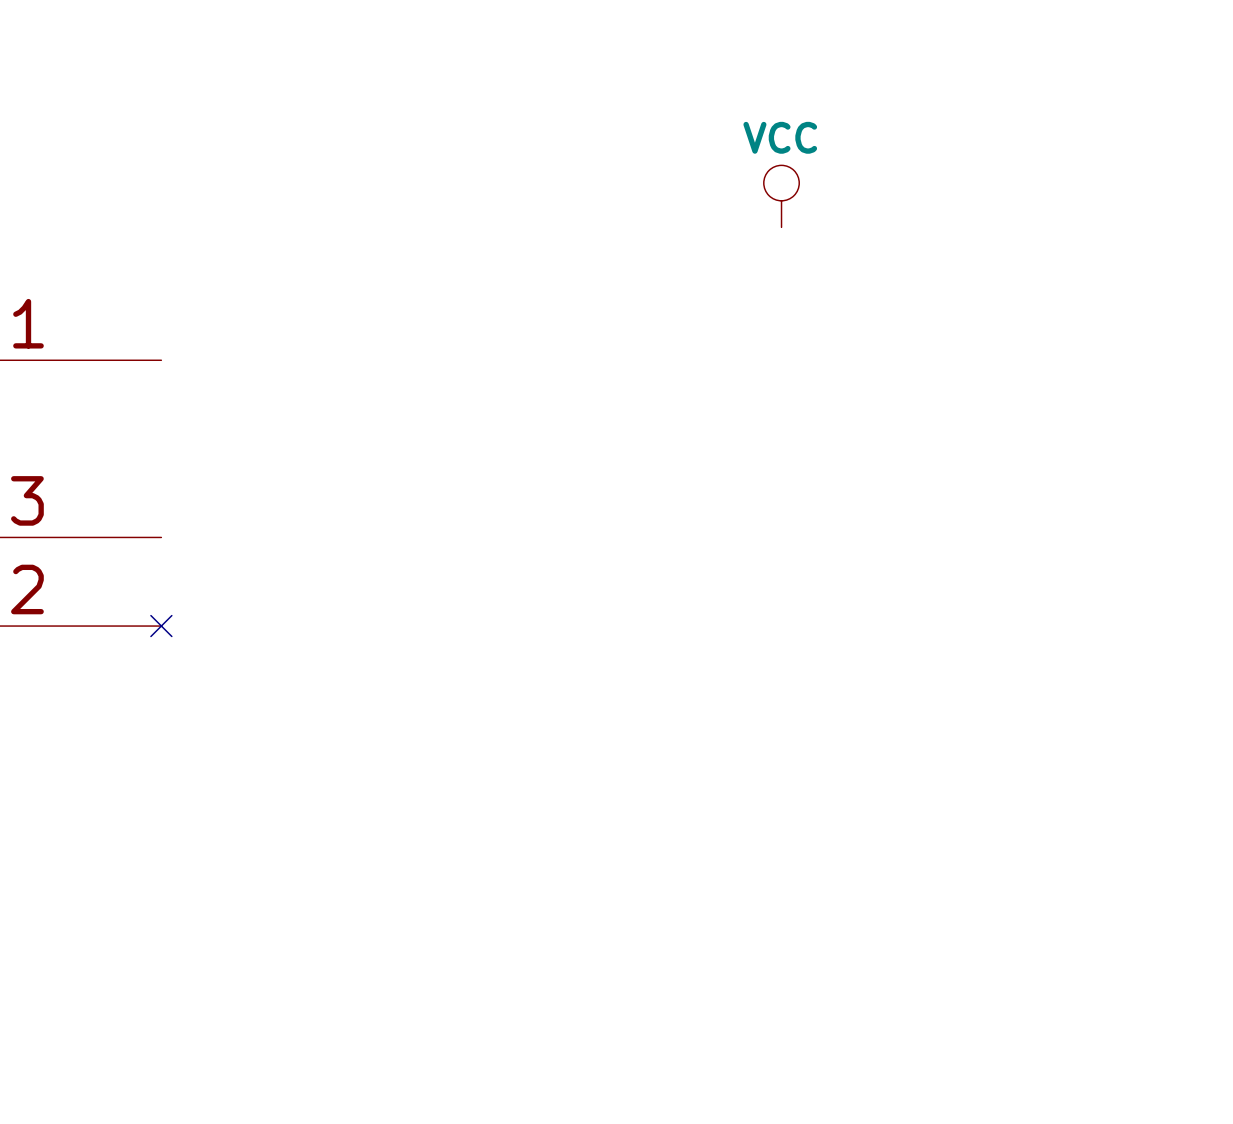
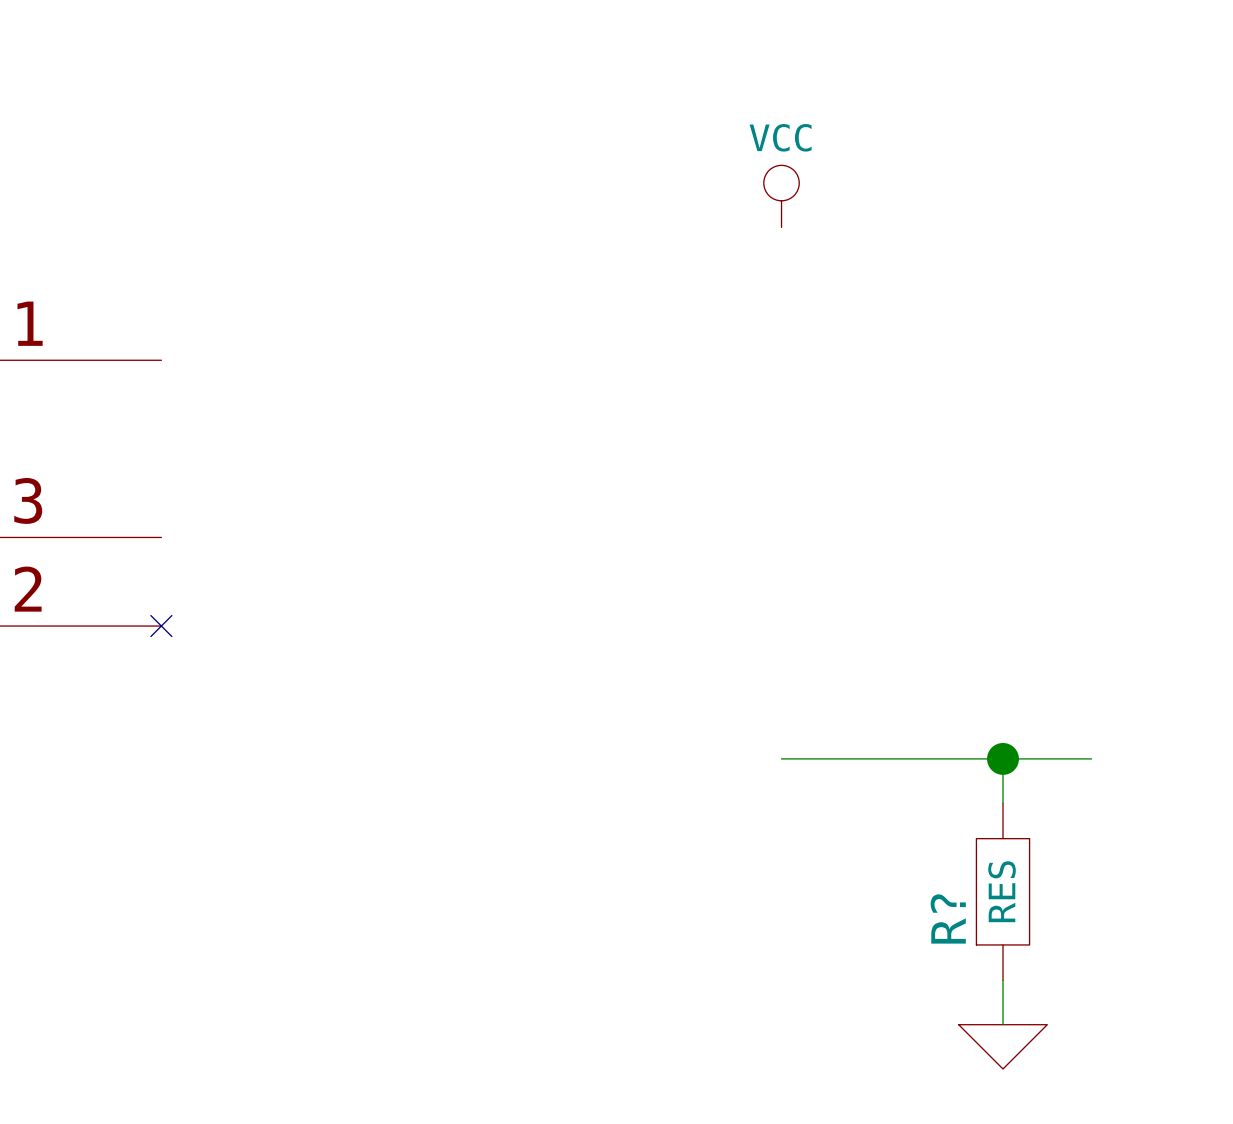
wire: none -> (781, 758) (1091, 758)
wire: none -> (1003, 758) (1003, 803)
junction: none -> (1003, 758)
R?: none -> RES (1003, 891)
wire: none -> (1003, 980) (1003, 1024)
power symbol: none -> (1003, 1046)

